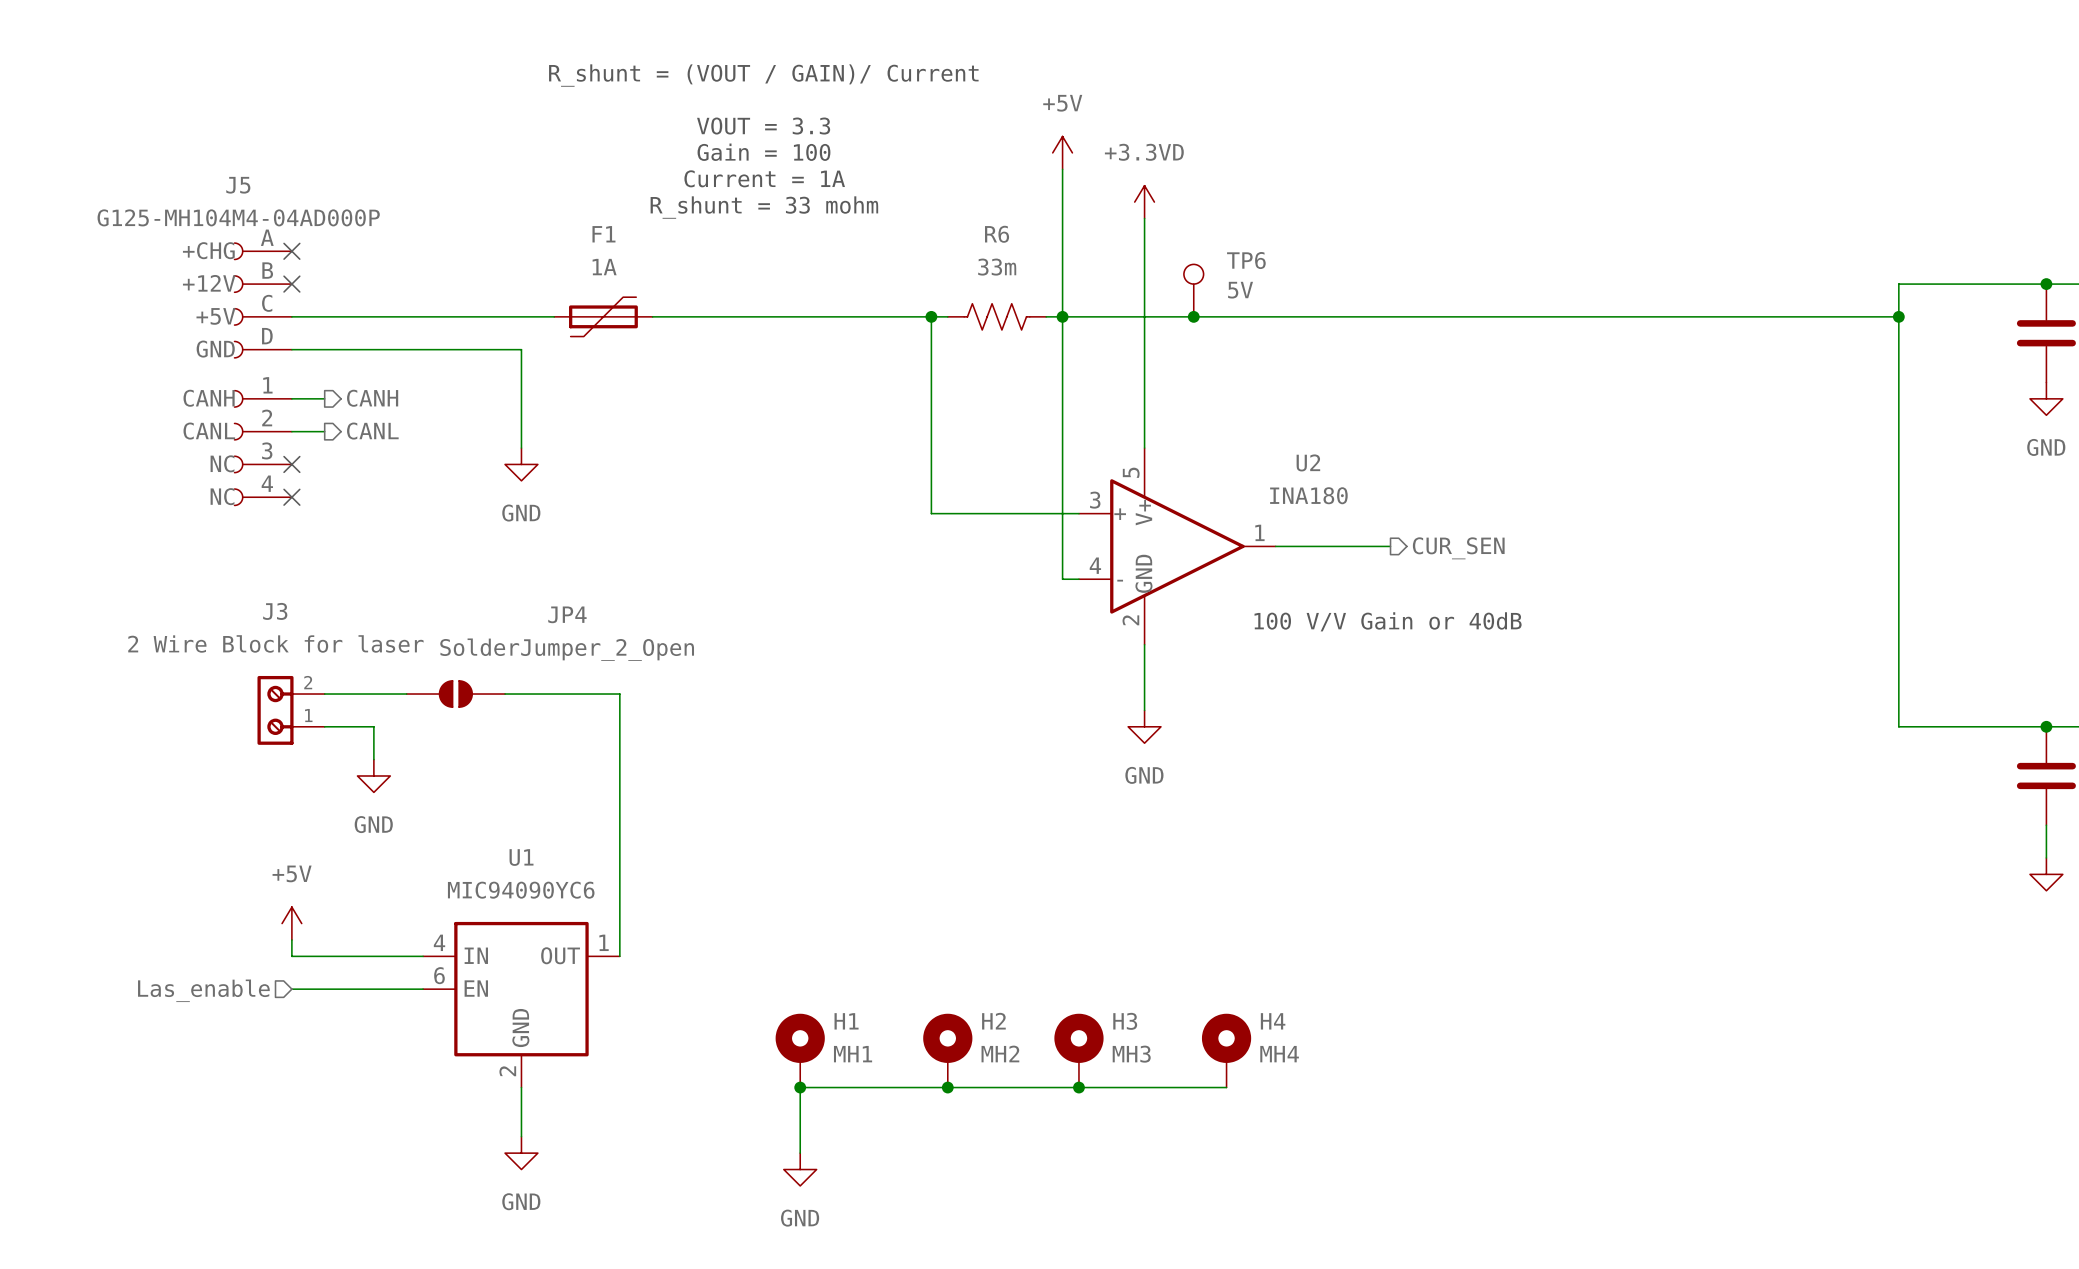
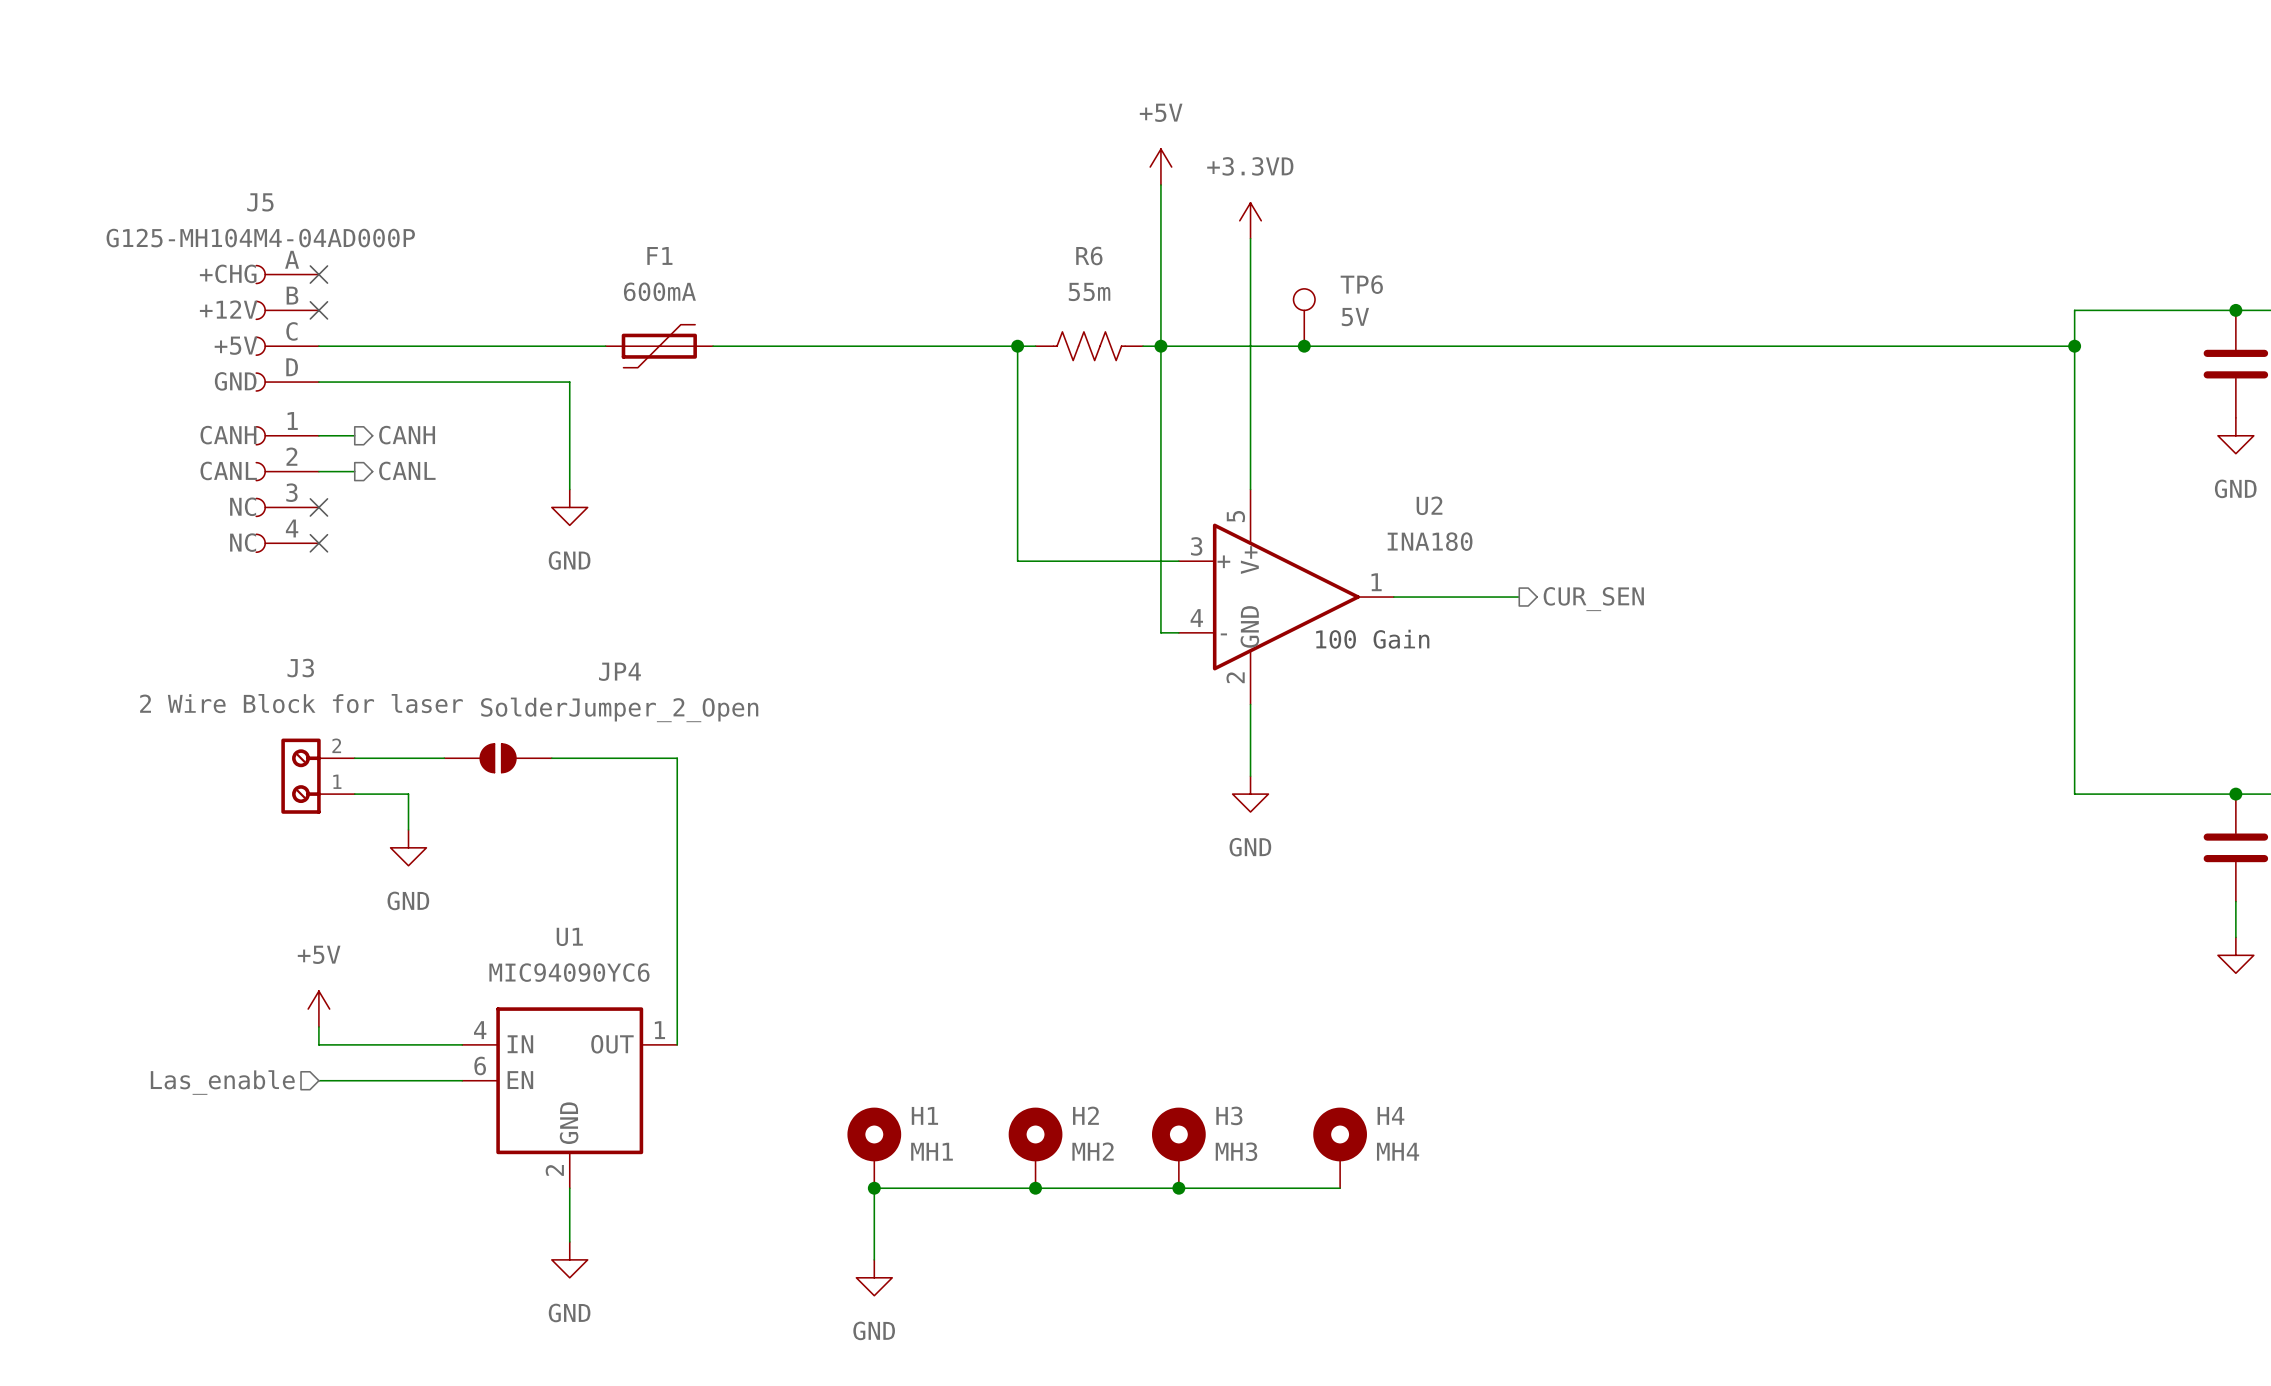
text: R_shunt = (VOUT / GAIN)/ Current (763, 75) -> none
text: VOUT = 3.3 (763, 126) -> none
text: Gain = 100 (763, 152) -> none
text: Current = 1A (764, 178) -> none
text: R_shunt = 33 mohm (764, 207) -> none
F1 value: 1A (604, 267) -> 600mA (659, 291)
R6 value: 33m (997, 267) -> 55m (1089, 291)
text: none -> 100 Gain (1372, 639)
text: 100 V/V Gain or 40dB (1388, 621) -> none

